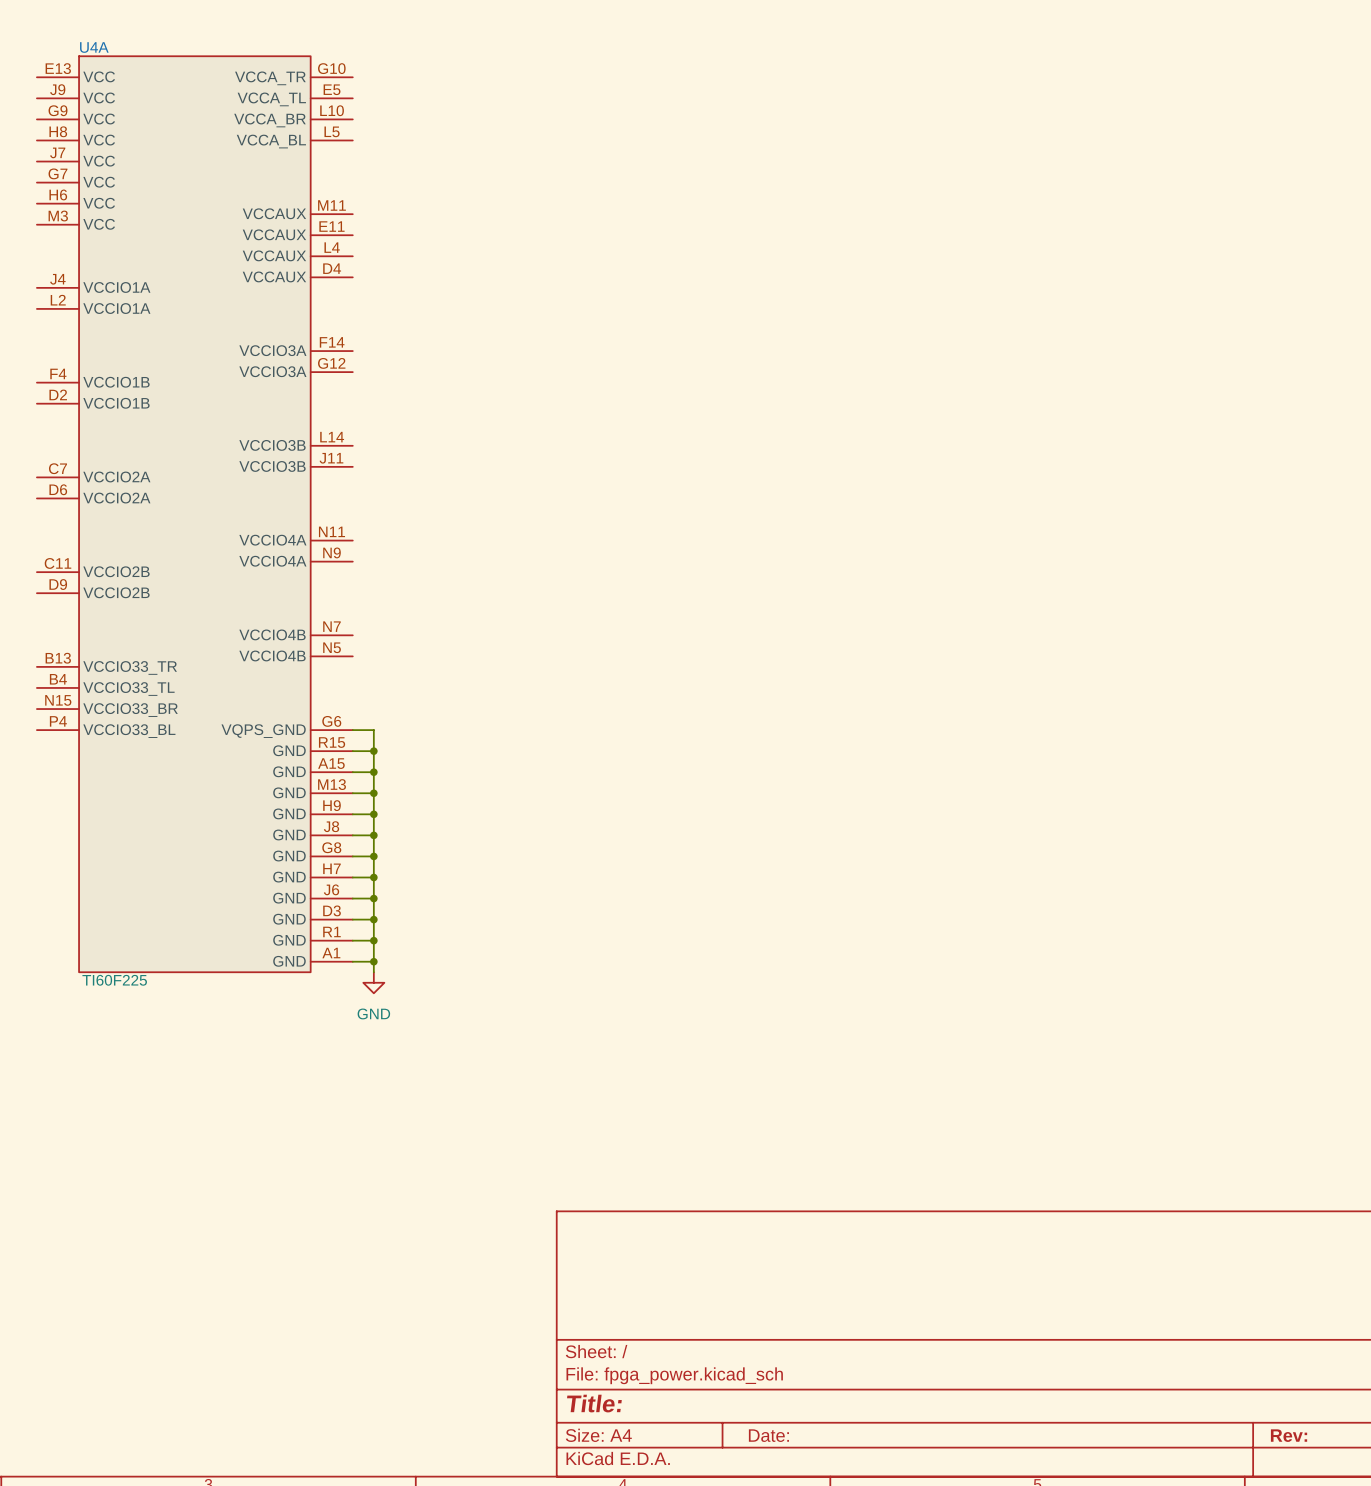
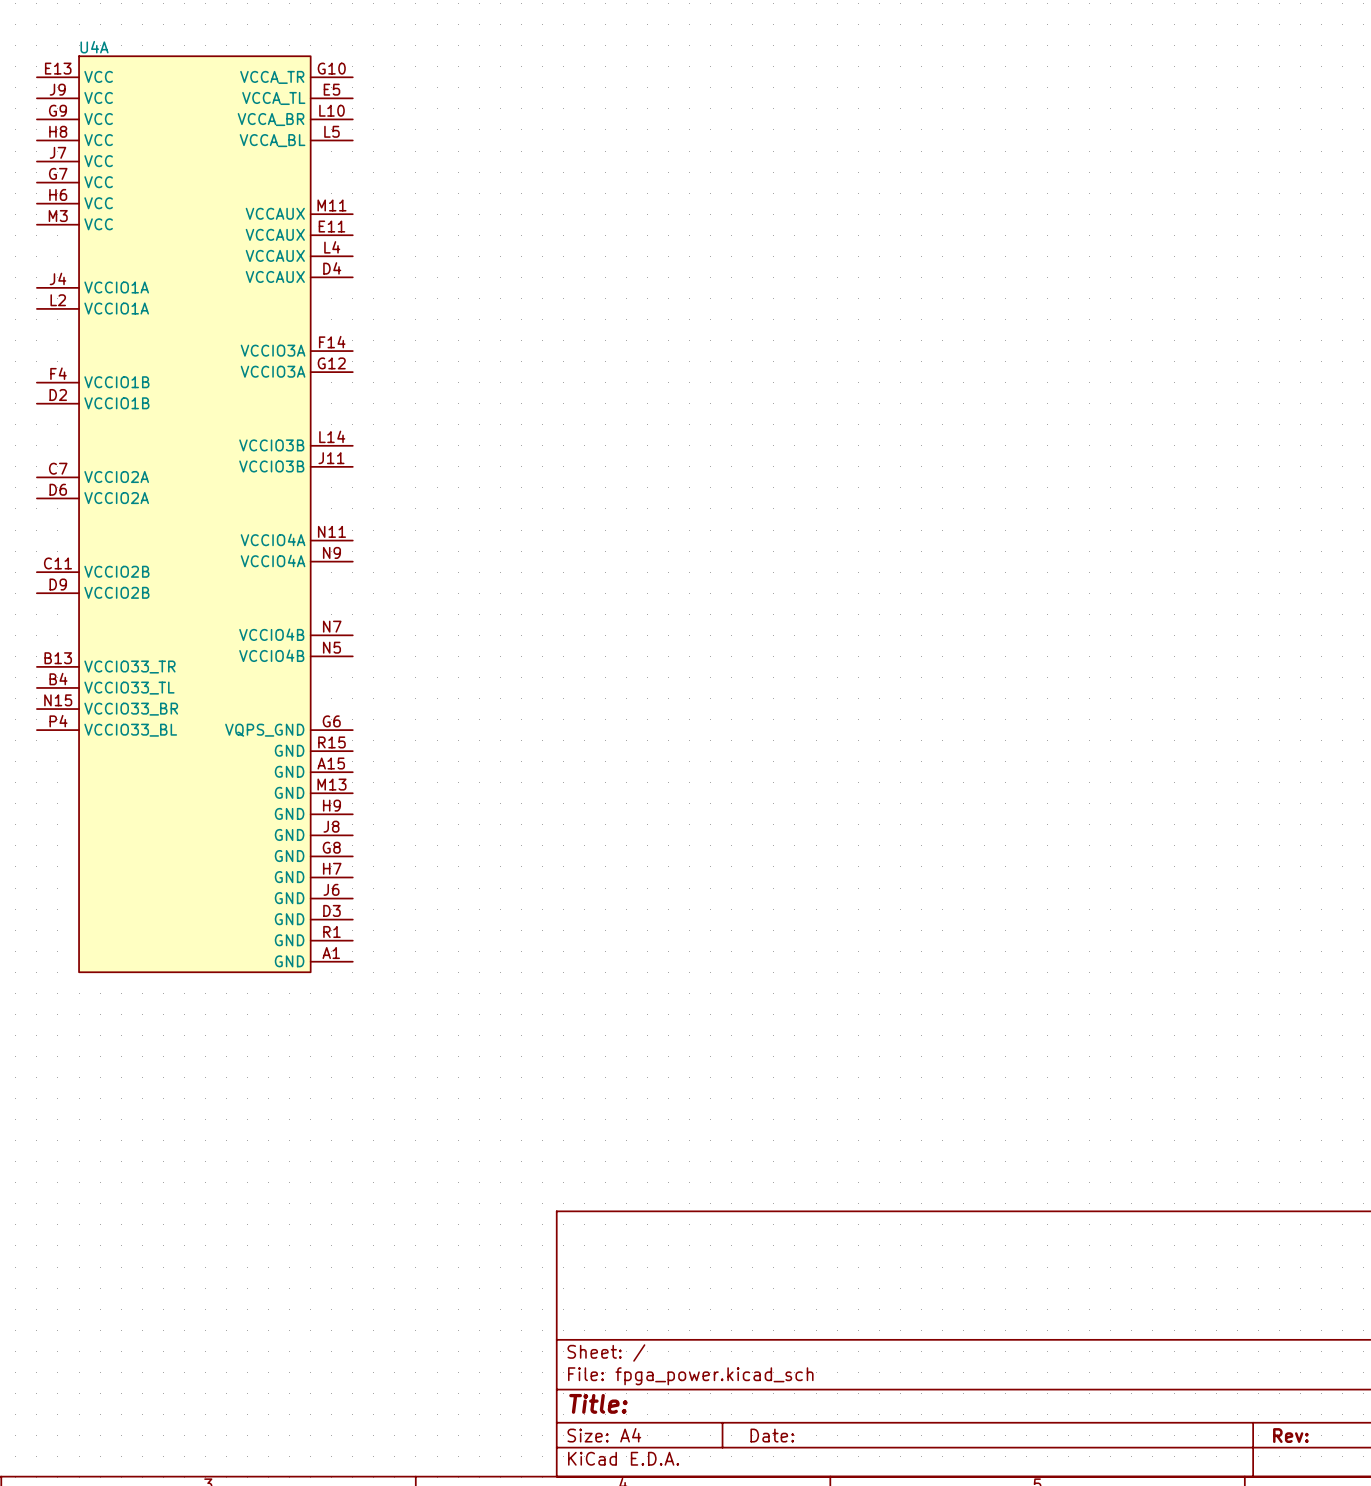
wire: (352, 730) (373, 730) (373, 972) -> none
wire: (352, 751) (373, 751) -> none
junction: (373, 751) -> none
wire: (352, 772) (373, 772) -> none
junction: (373, 772) -> none
wire: (352, 793) (373, 793) -> none
junction: (373, 793) -> none
wire: (352, 814) (373, 814) -> none
junction: (373, 814) -> none
wire: (352, 835) (373, 835) -> none
junction: (373, 835) -> none
wire: (352, 856) (373, 856) -> none
junction: (373, 856) -> none
wire: (352, 877) (373, 877) -> none
junction: (373, 877) -> none
wire: (352, 898) (373, 898) -> none
junction: (373, 898) -> none
wire: (352, 919) (373, 919) -> none
junction: (373, 919) -> none
wire: (352, 940) (373, 940) -> none
junction: (373, 940) -> none
wire: (352, 961) (373, 961) -> none
junction: (373, 961) -> none
U4A value: TI60F225 (114, 980) -> none
power symbol: GND (373, 982) -> none

